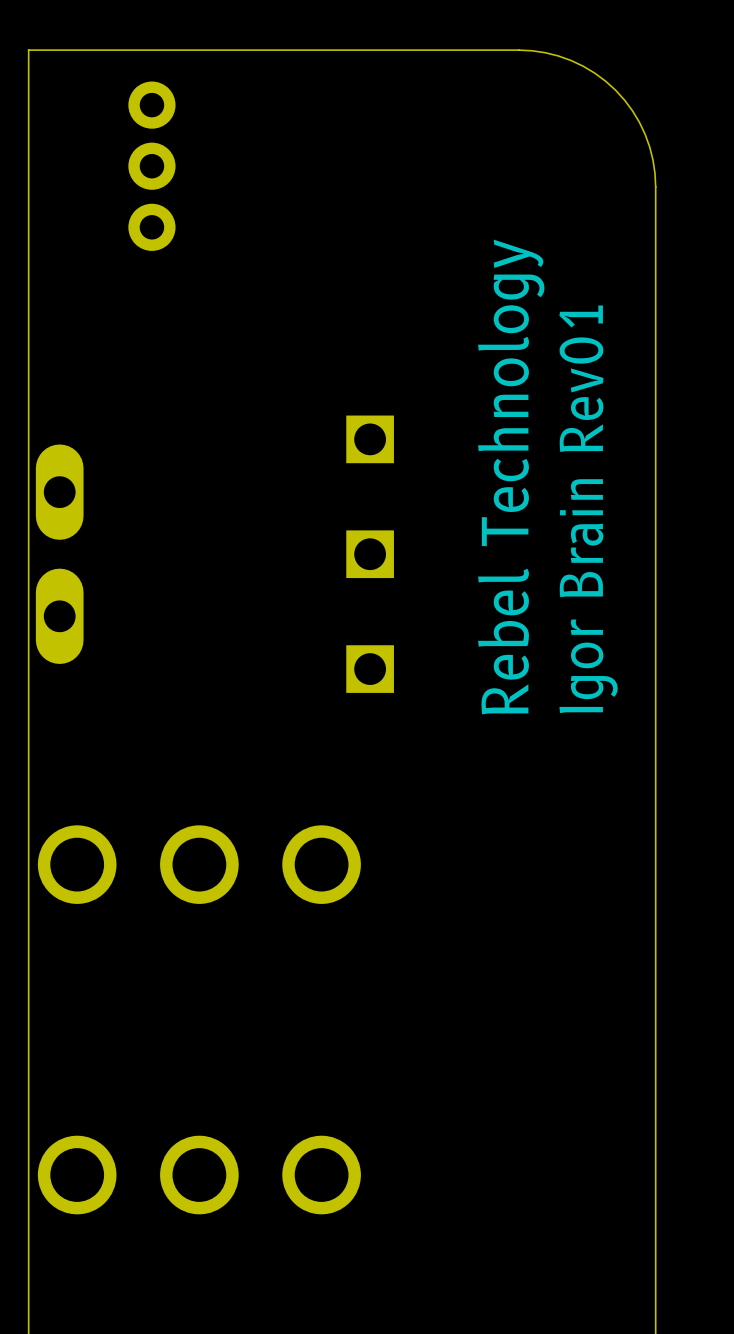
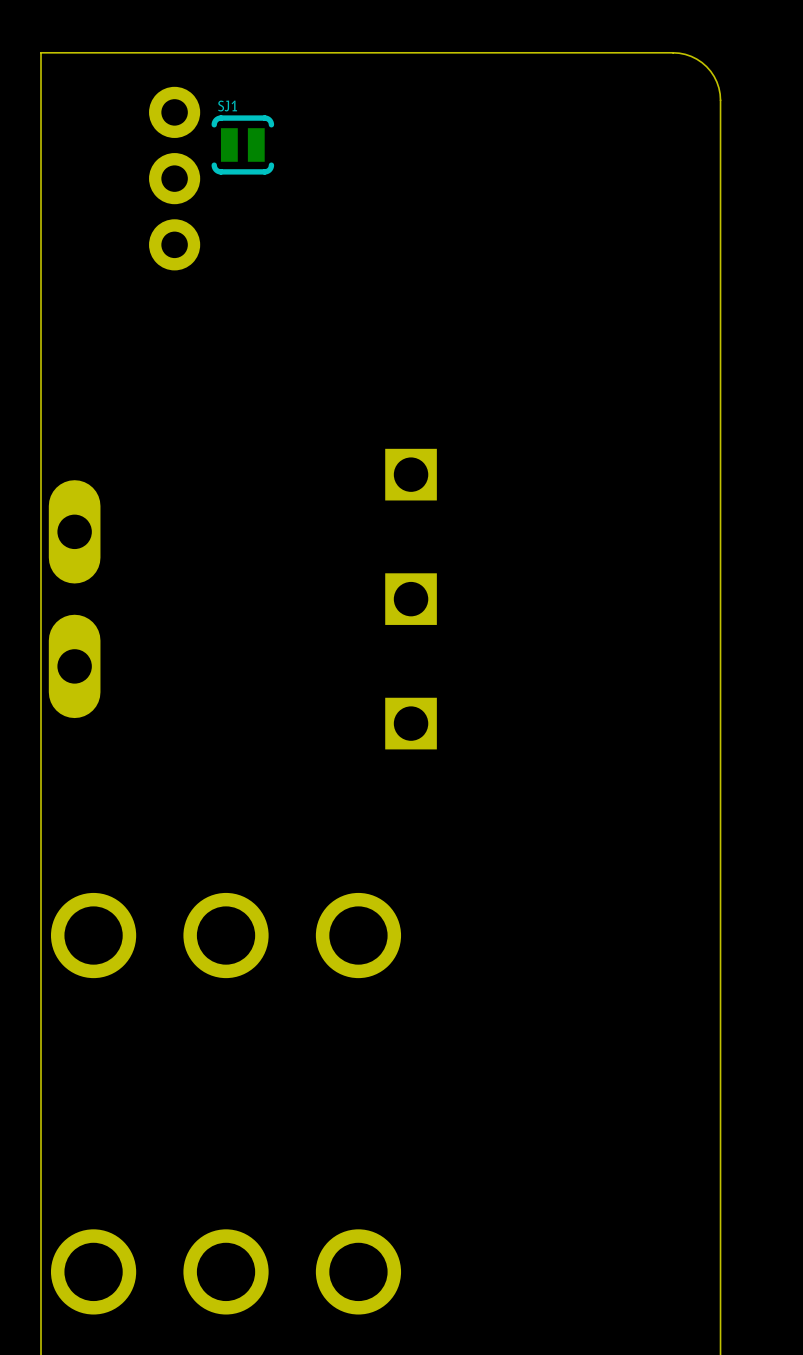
board edge: (518, 50) (545, 52) (571, 60) (594, 73) (615, 90) (632, 110) (645, 134) (653, 160) (655, 187) -> (572, 52) (679, 53) (691, 56) (706, 66) (716, 82) (720, 94) (720, 201)
SJ1: none -> (242, 144)
text: Rebel Technology (511, 477) -> none
text: Igor Brain Rev01 (588, 509) -> none

